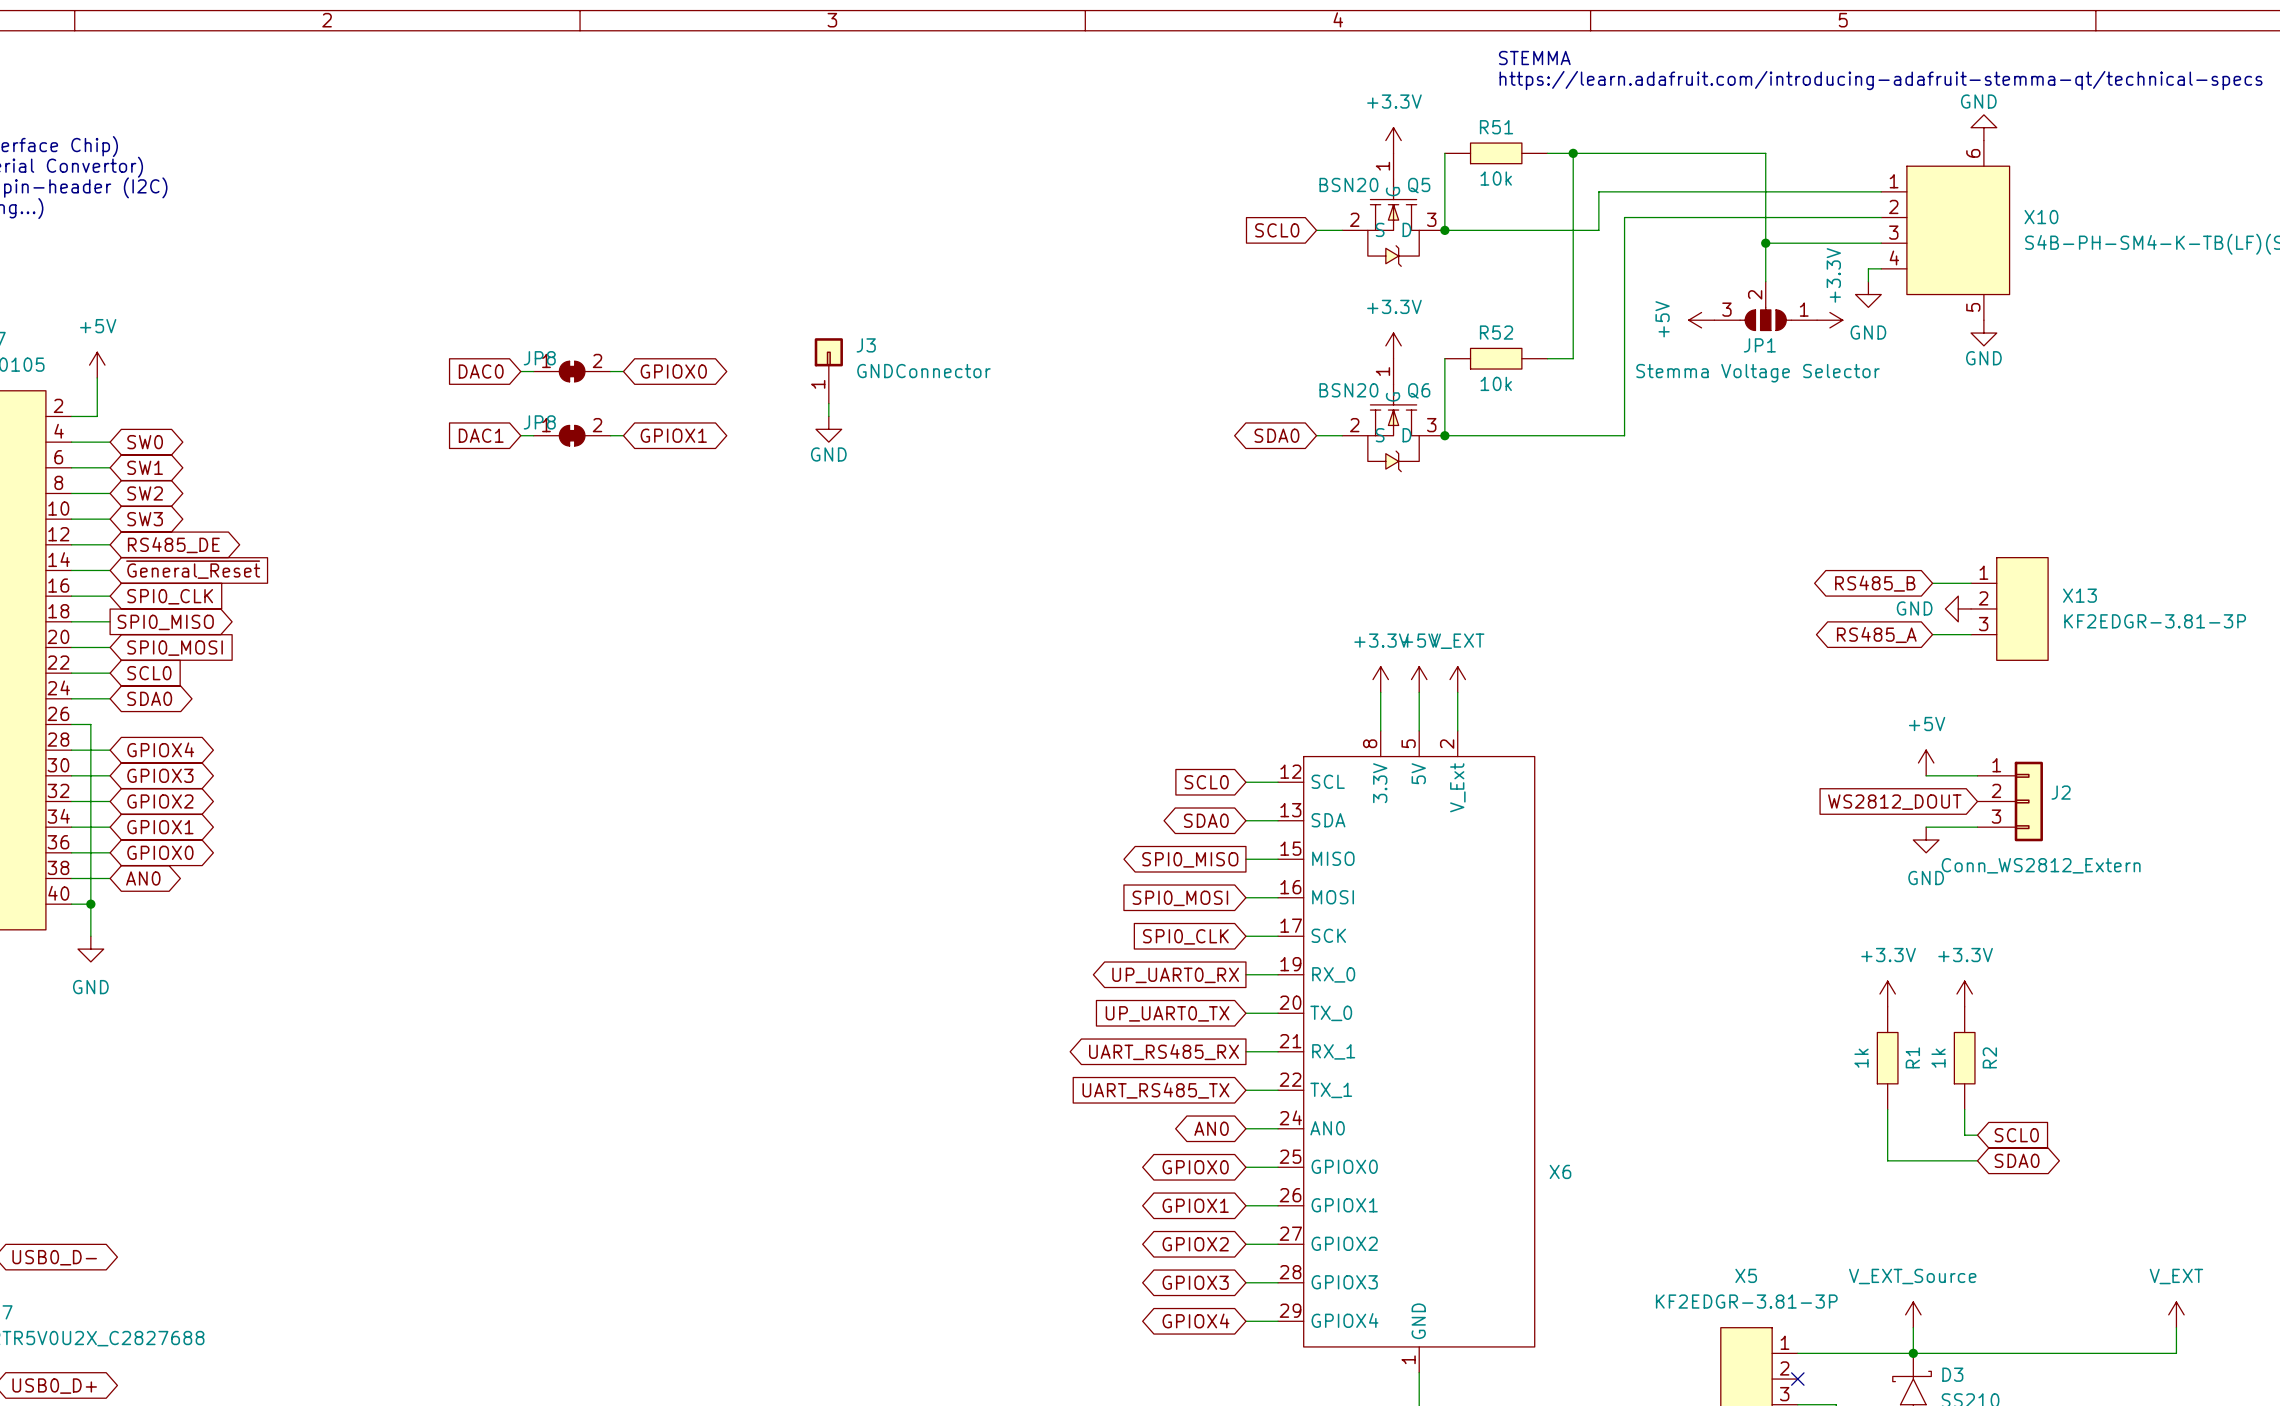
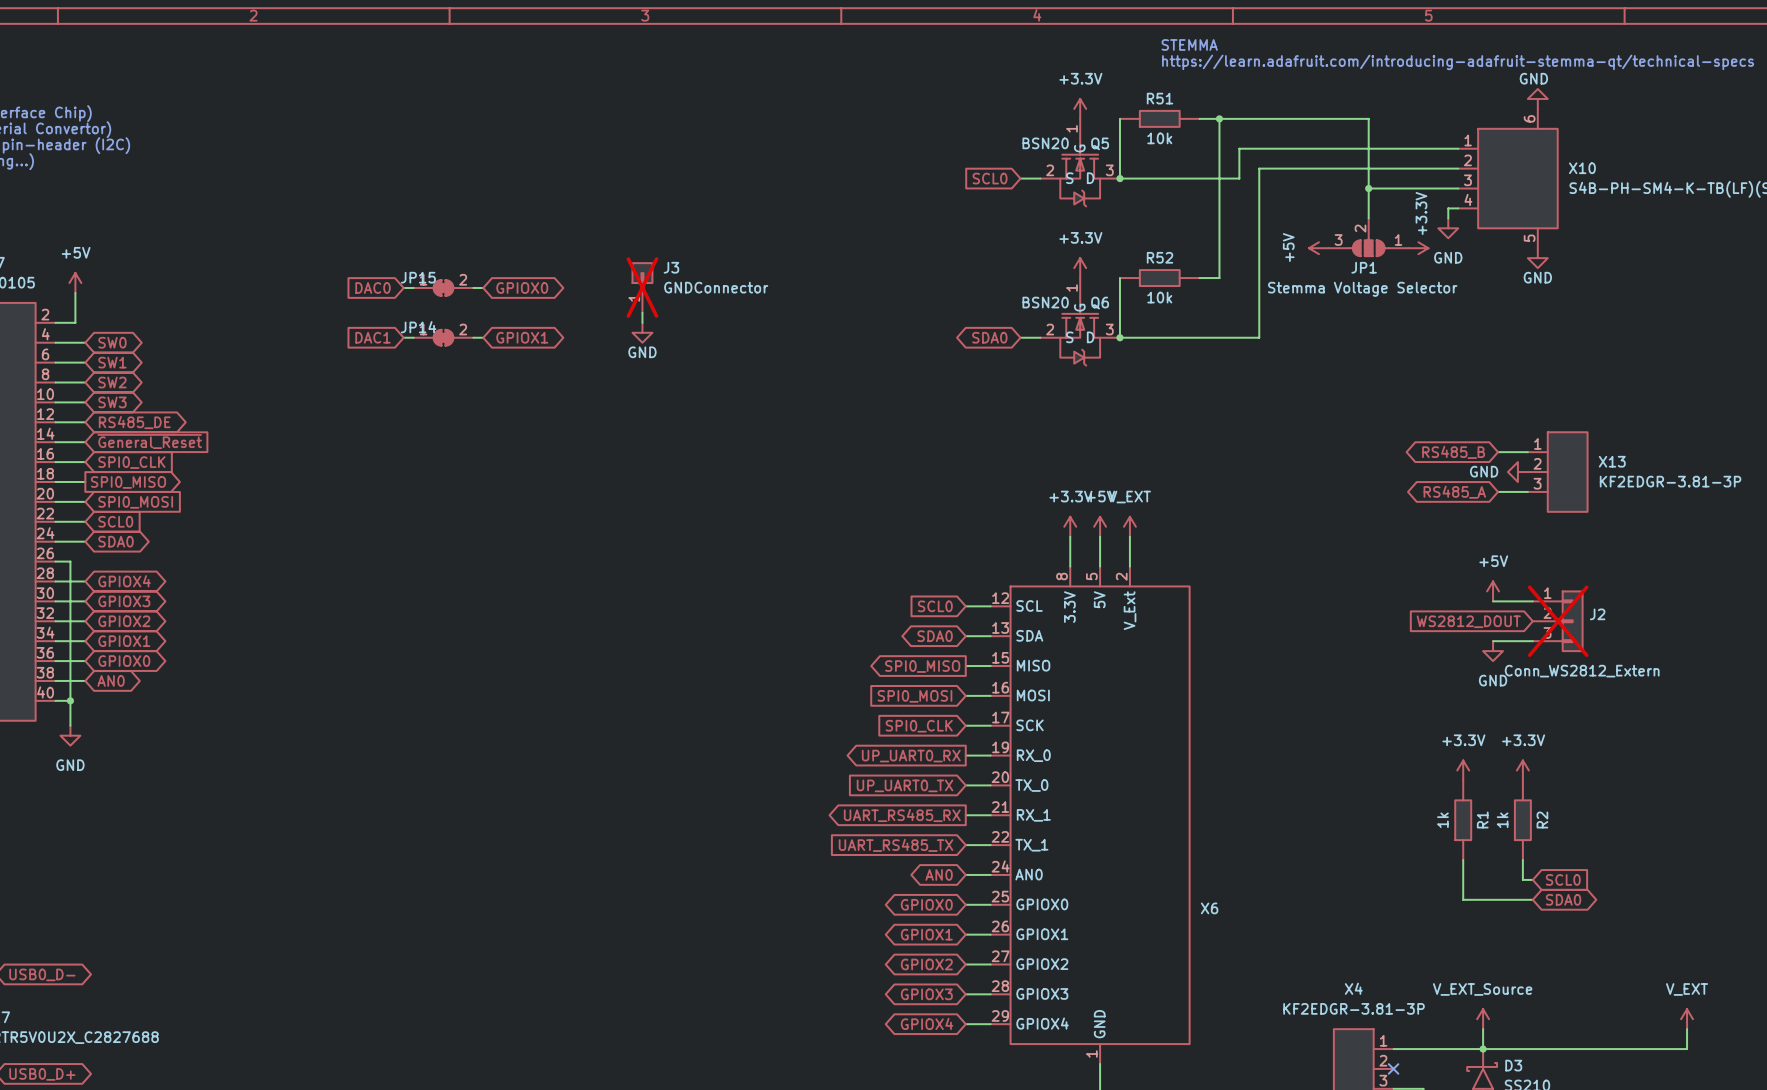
JP8 name: JP8 (539, 358) -> JP15 (418, 277)
J3 do-not-place cross: none -> (642, 287)
JP8 name: JP8 (539, 422) -> JP14 (418, 327)
J2 do-not-place cross: none -> (1558, 621)
X5 name: X5 (1746, 1275) -> X4 (1353, 988)

